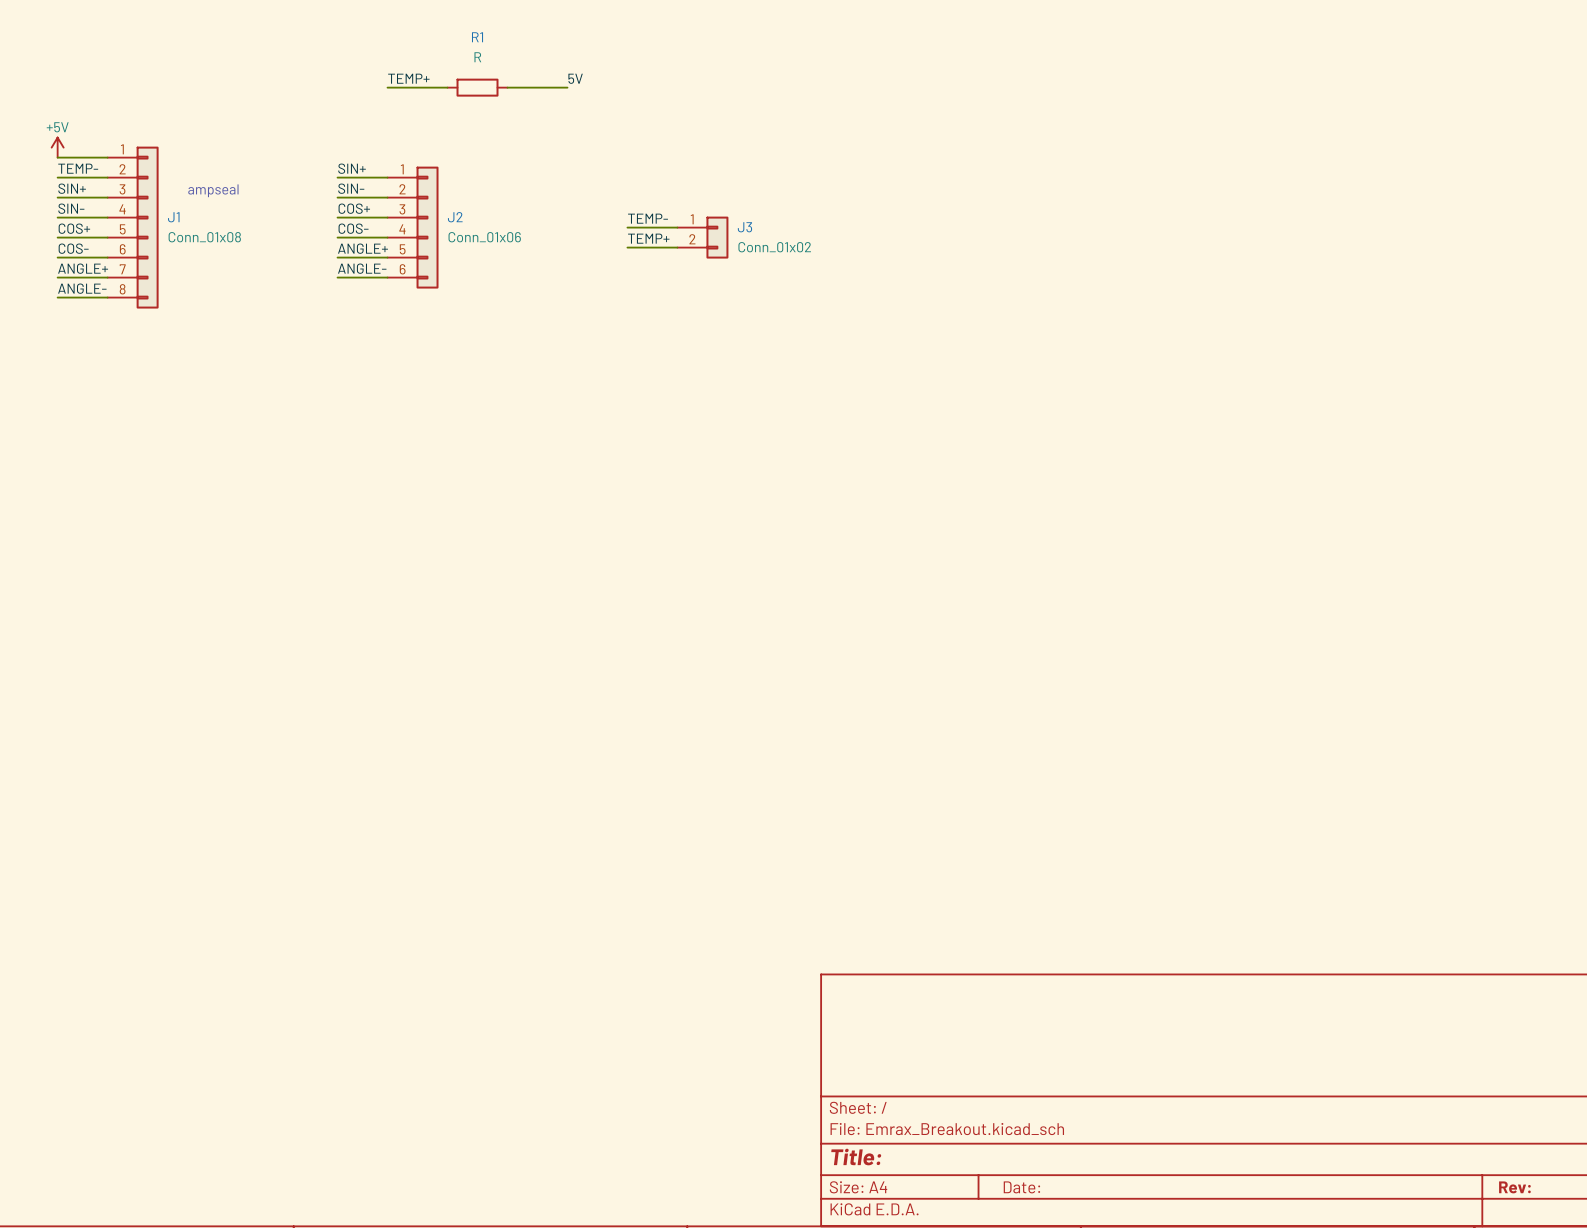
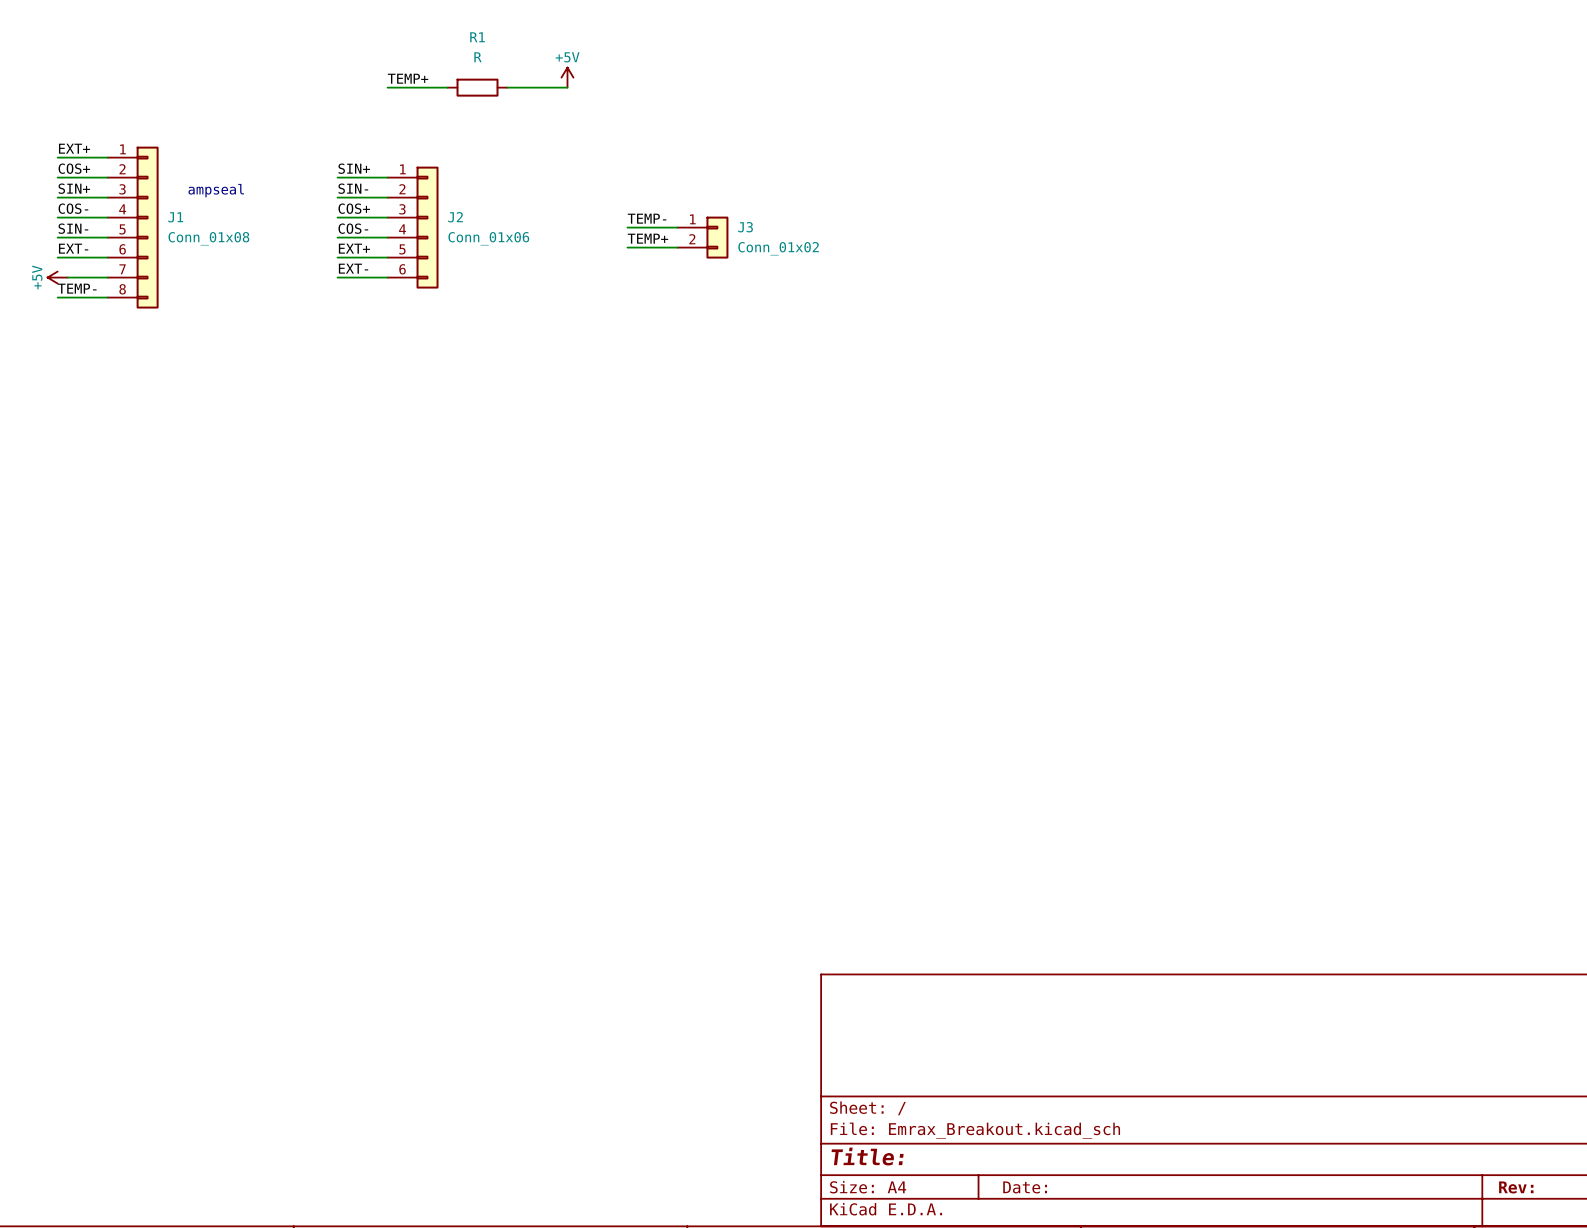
power symbol: none -> +5V (567, 77)
label: 5V (575, 78) -> none
power symbol rotation: 0° (57, 147) -> 90° counterclockwise (57, 277)
power symbol position: +5V (57, 147) -> +5V (57, 277)
label: none -> EXT+ (74, 148)
label: TEMP- (78, 168) -> COS+ (74, 168)
label: SIN- (71, 208) -> COS- (73, 208)
label: COS+ (74, 228) -> SIN- (73, 228)
label: COS- (73, 248) -> EXT- (73, 248)
label: ANGLE+ (362, 248) -> EXT+ (354, 248)
label: ANGLE+ (83, 268) -> none
label: ANGLE- (362, 268) -> EXT- (353, 268)
label: ANGLE- (82, 288) -> TEMP- (77, 288)

